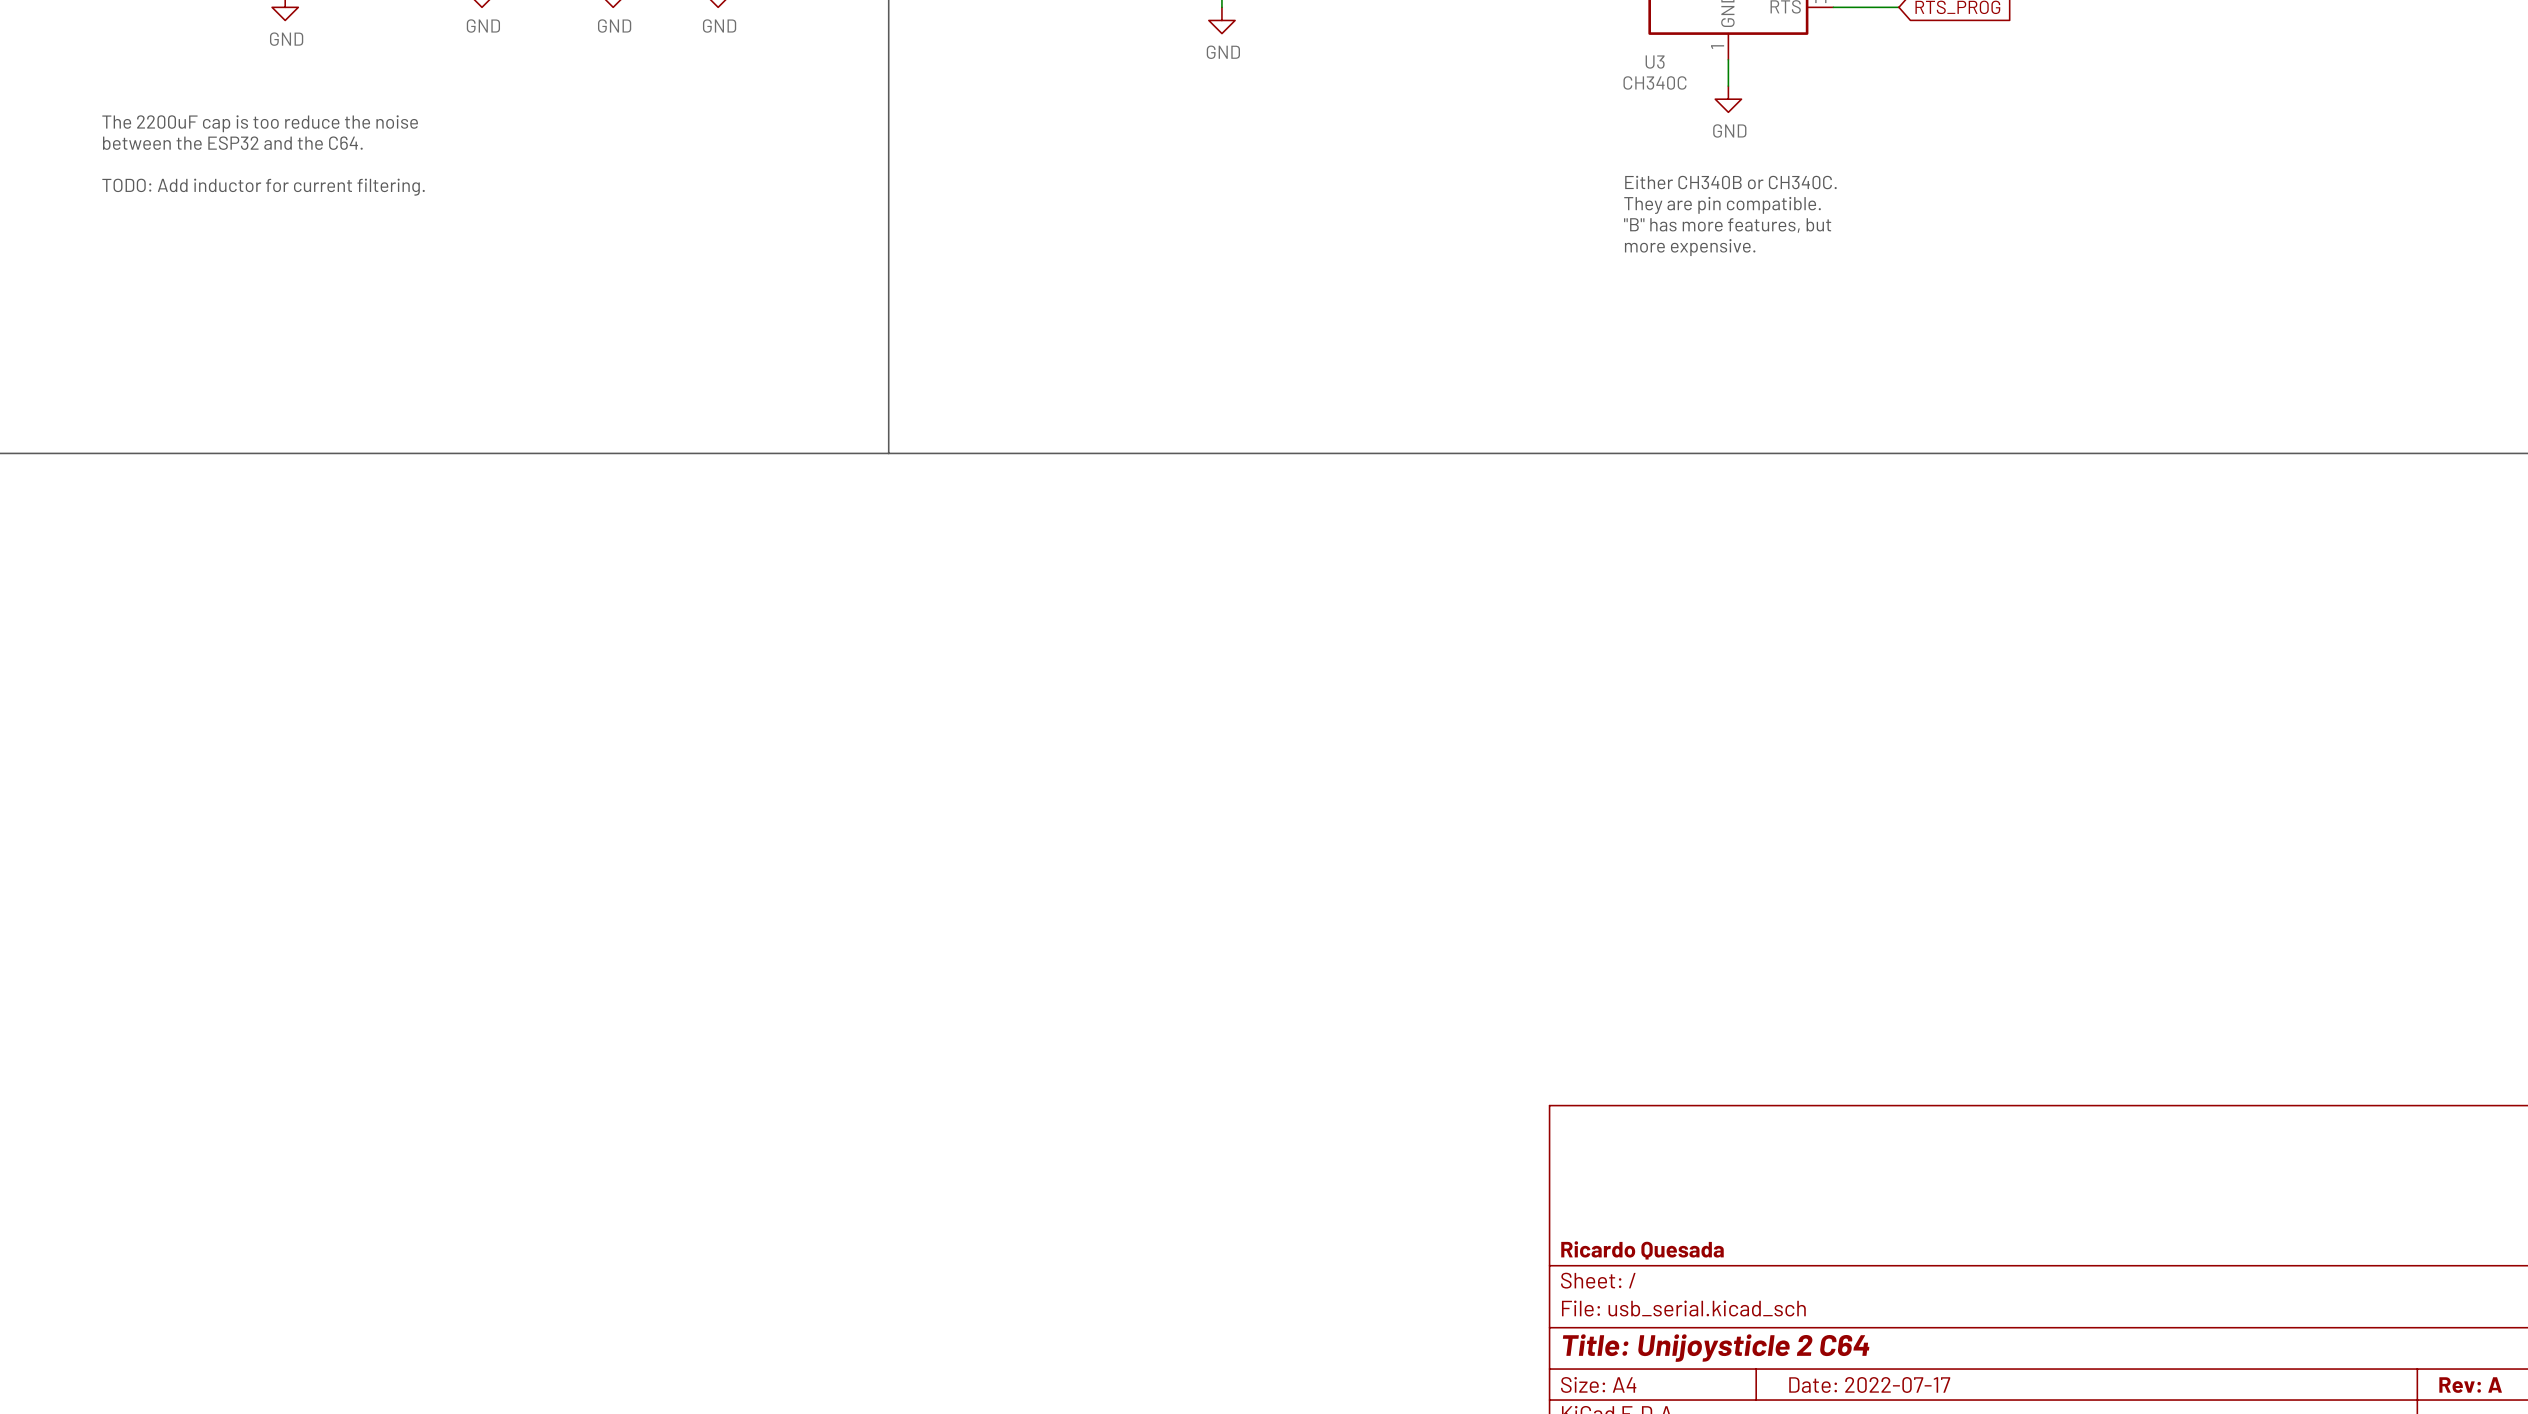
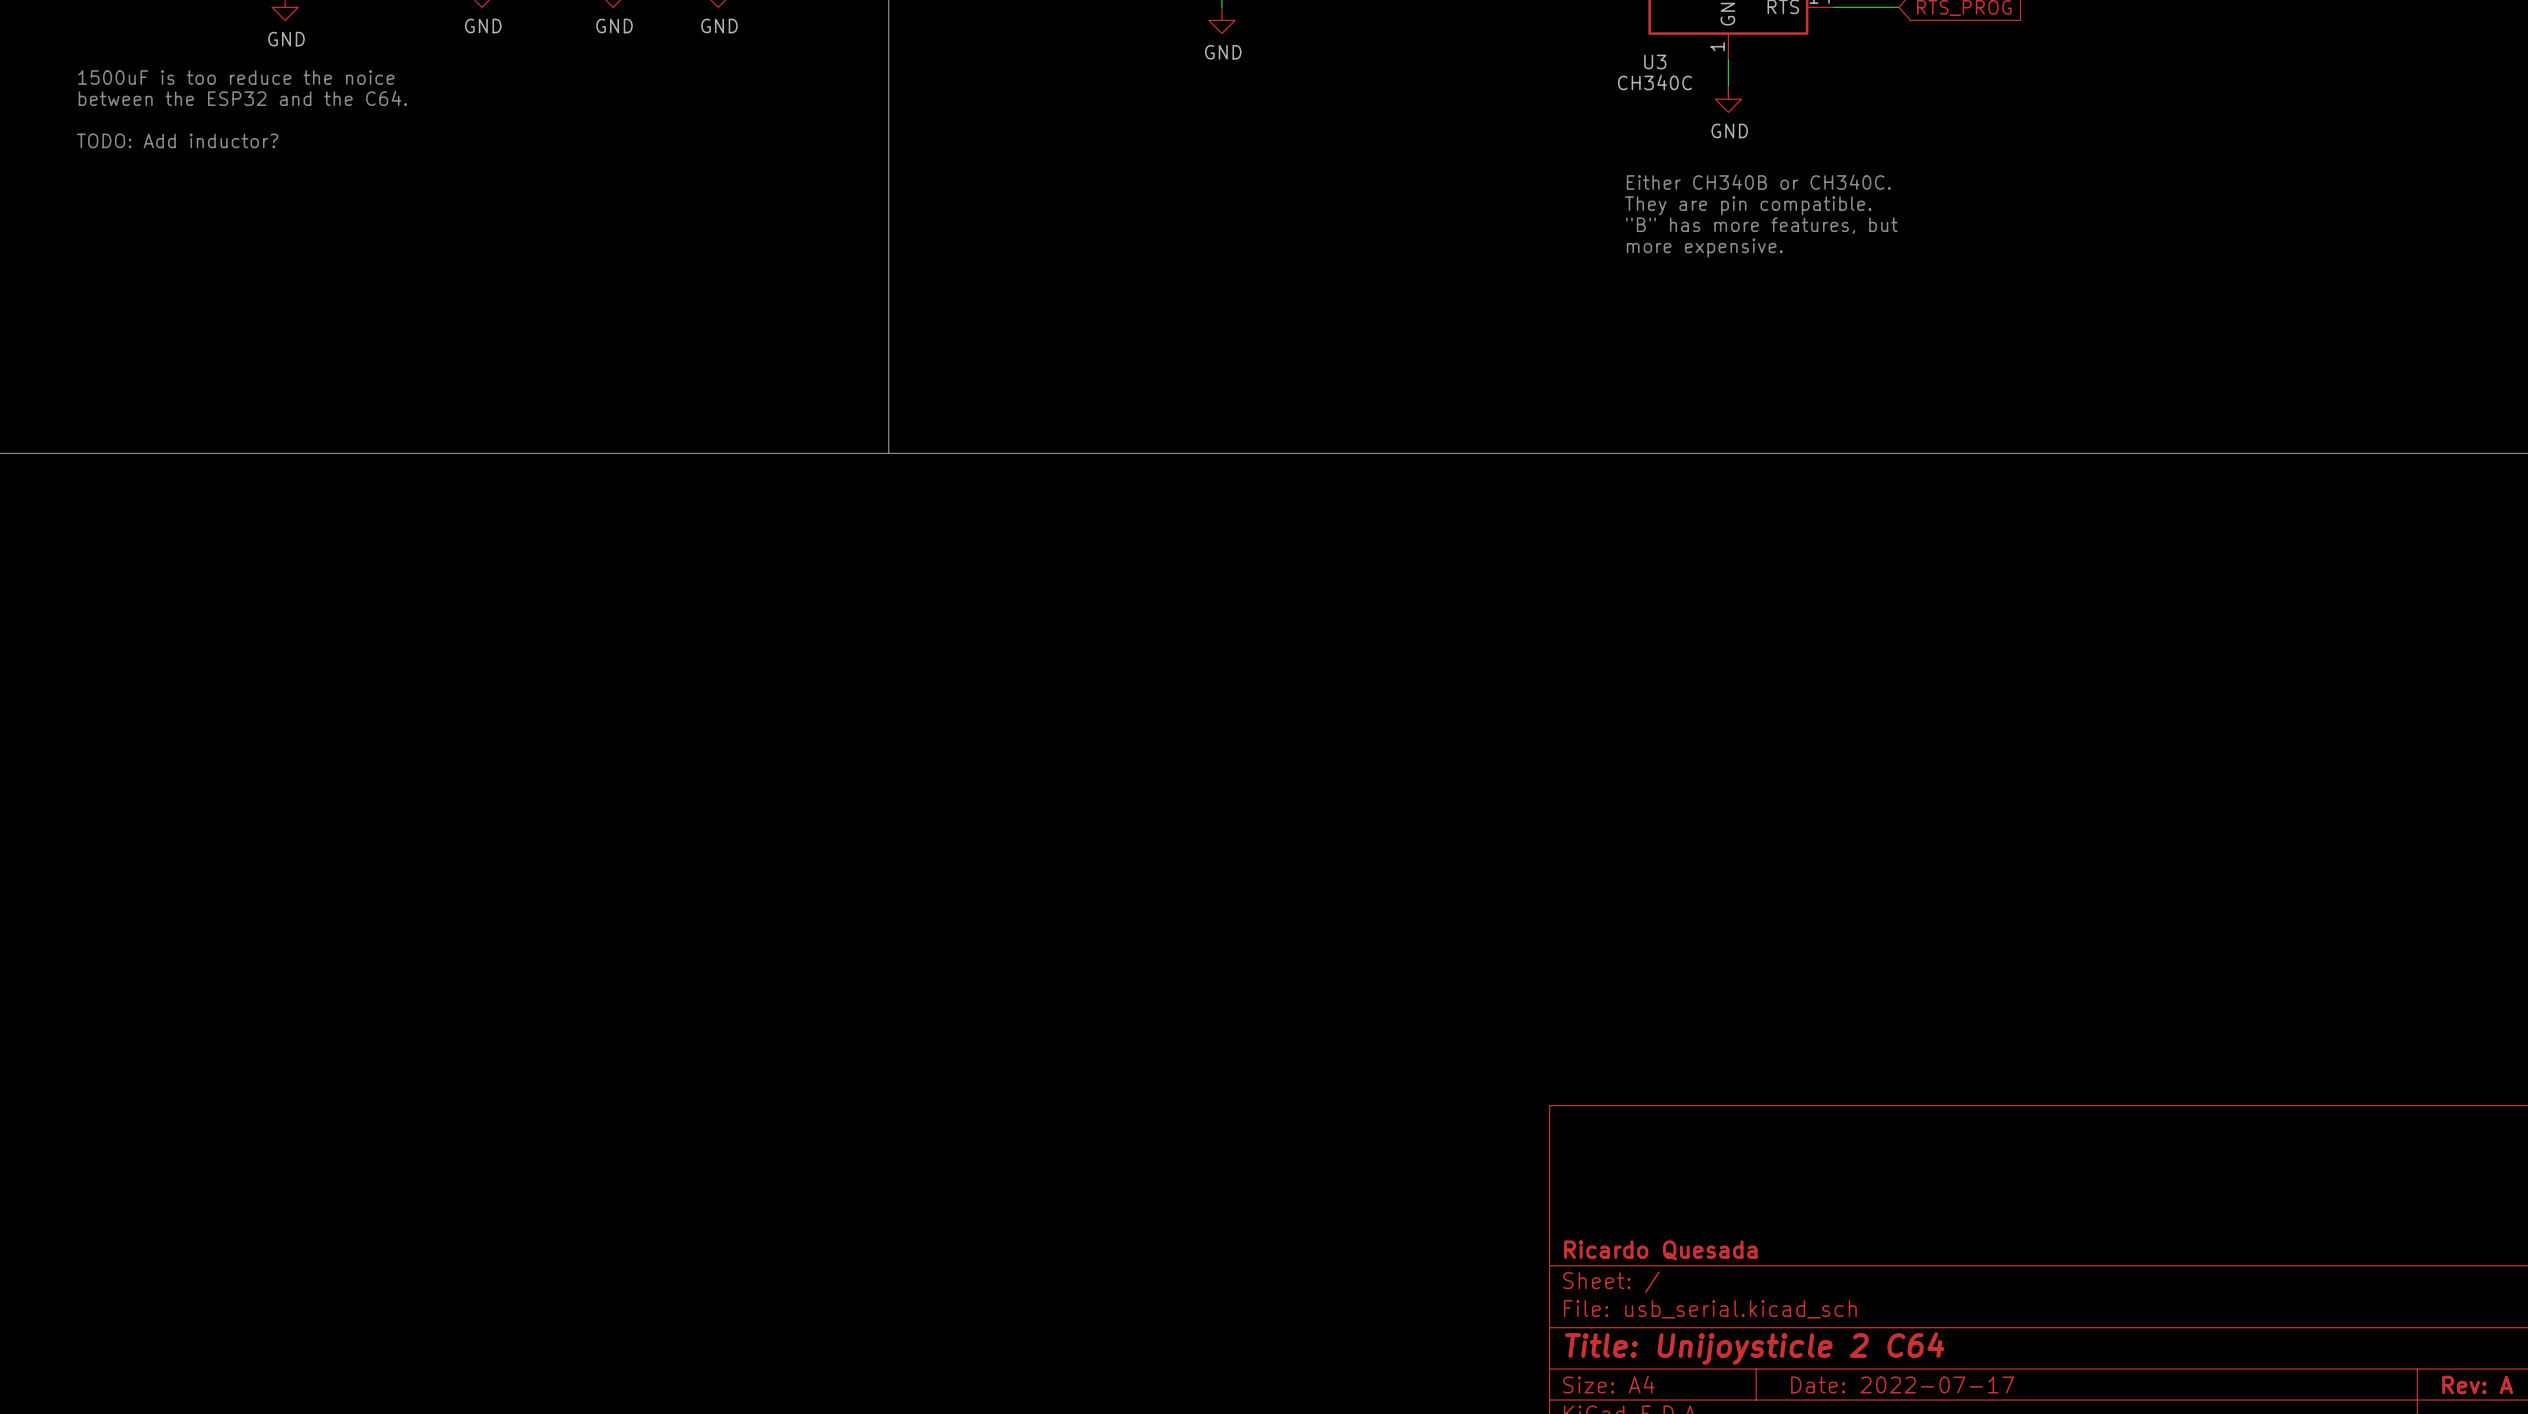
text: none -> 1500uF is too reduce the noice (236, 77)
text: The 2200uF cap is too reduce the noise (260, 123) -> none
text: none -> TODO: Add inductor? (177, 140)
text position: between the ESP32 and the C64. (232, 143) -> between the ESP32 and the C64. (242, 98)
text: TODO: Add inductor for current filtering. (263, 187) -> none

